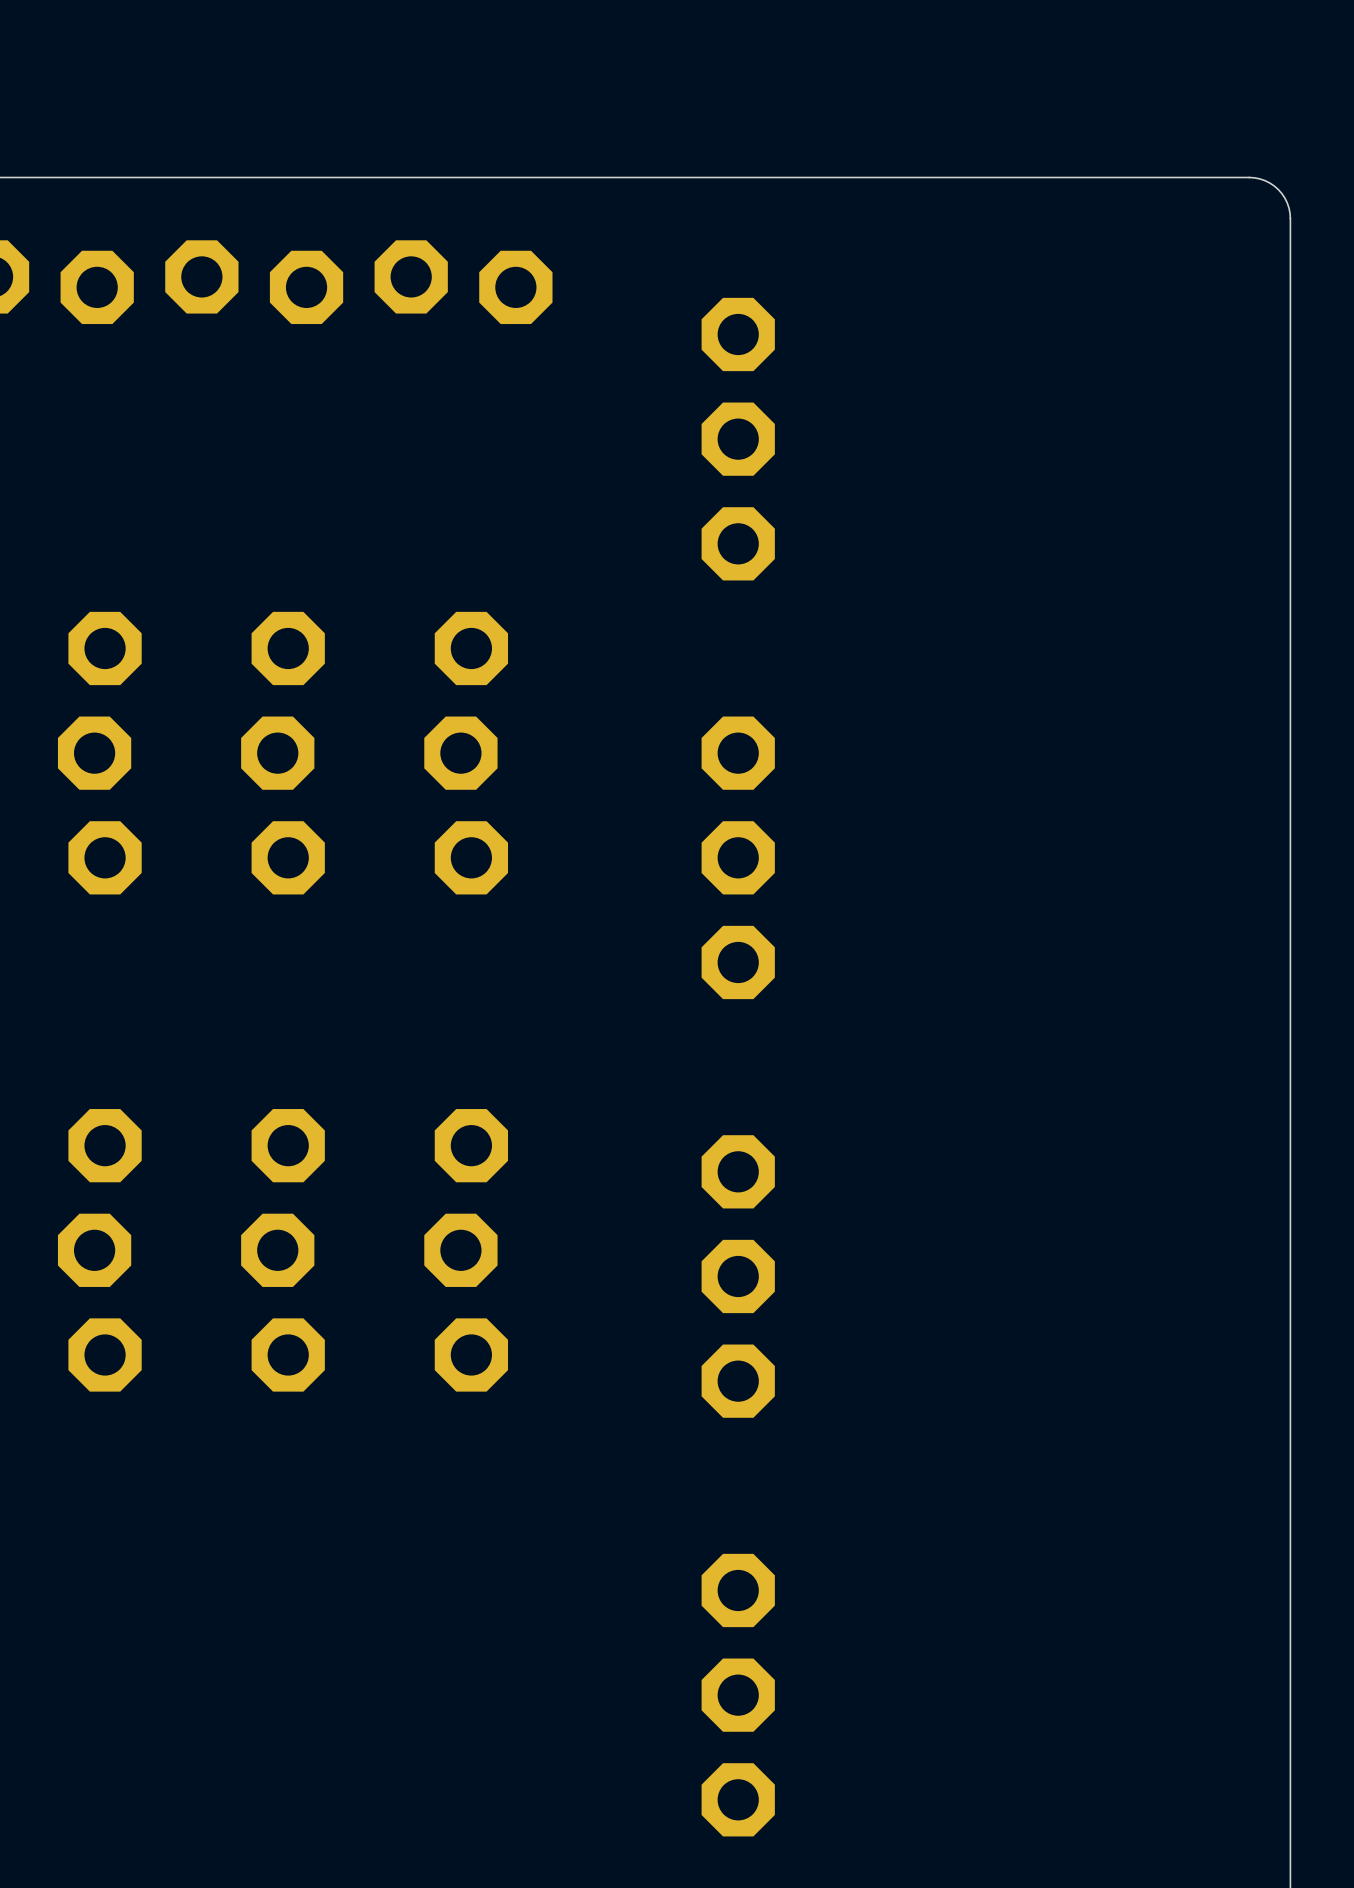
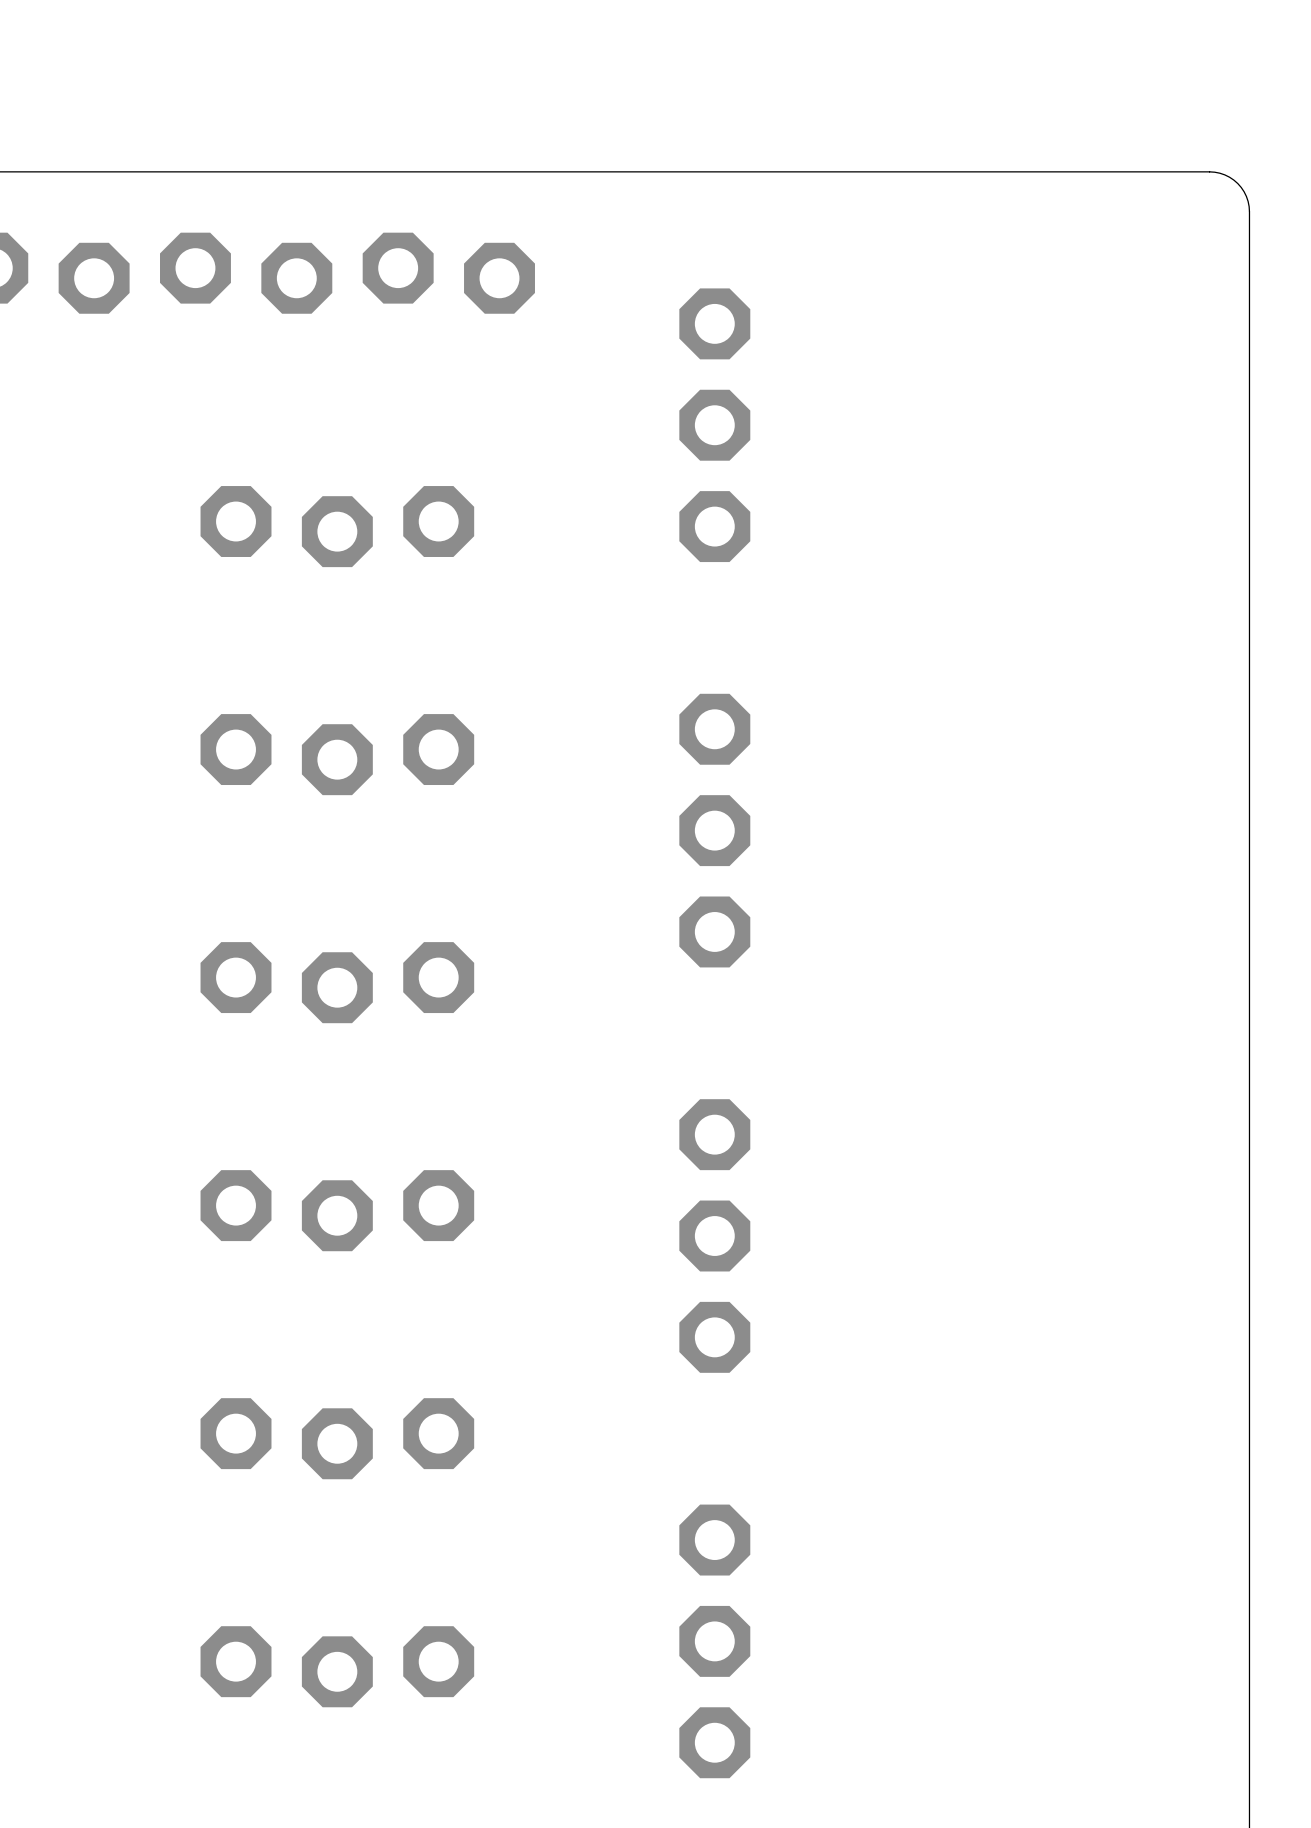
part: none -> (337, 526)
part: (99, 753) -> none
part: (282, 753) -> none
part: (466, 753) -> none
part: none -> (337, 754)
part: none -> (337, 982)
part: (99, 1250) -> none
part: (282, 1250) -> none
part: none -> (337, 1210)
part: (466, 1250) -> none
part: none -> (337, 1438)
part: none -> (337, 1666)

